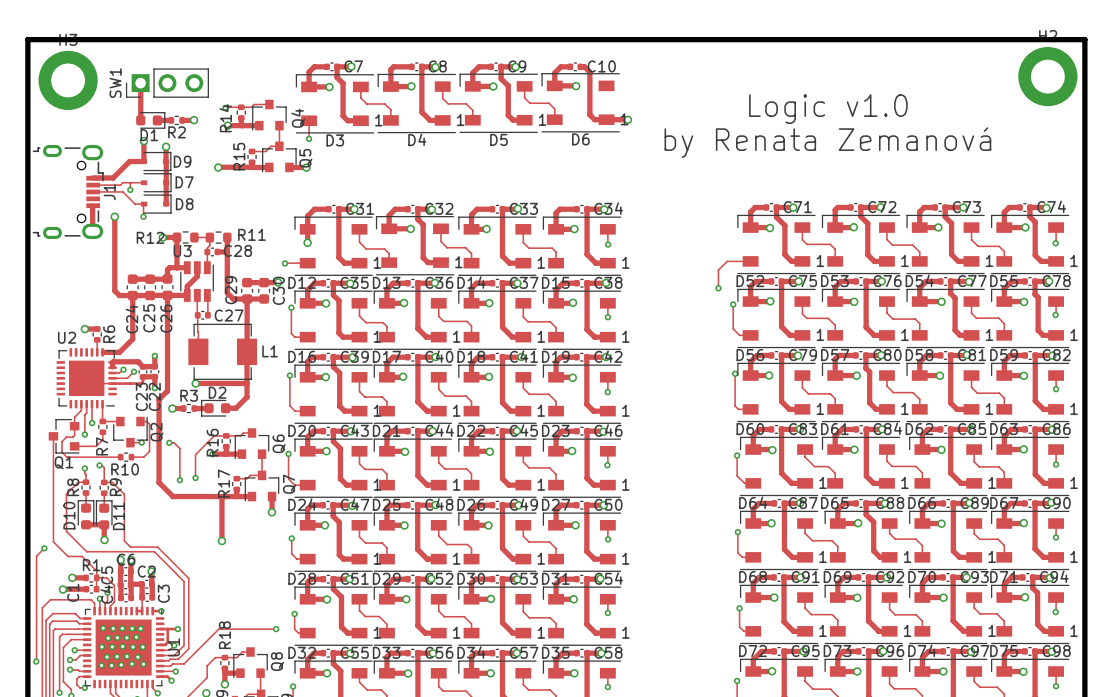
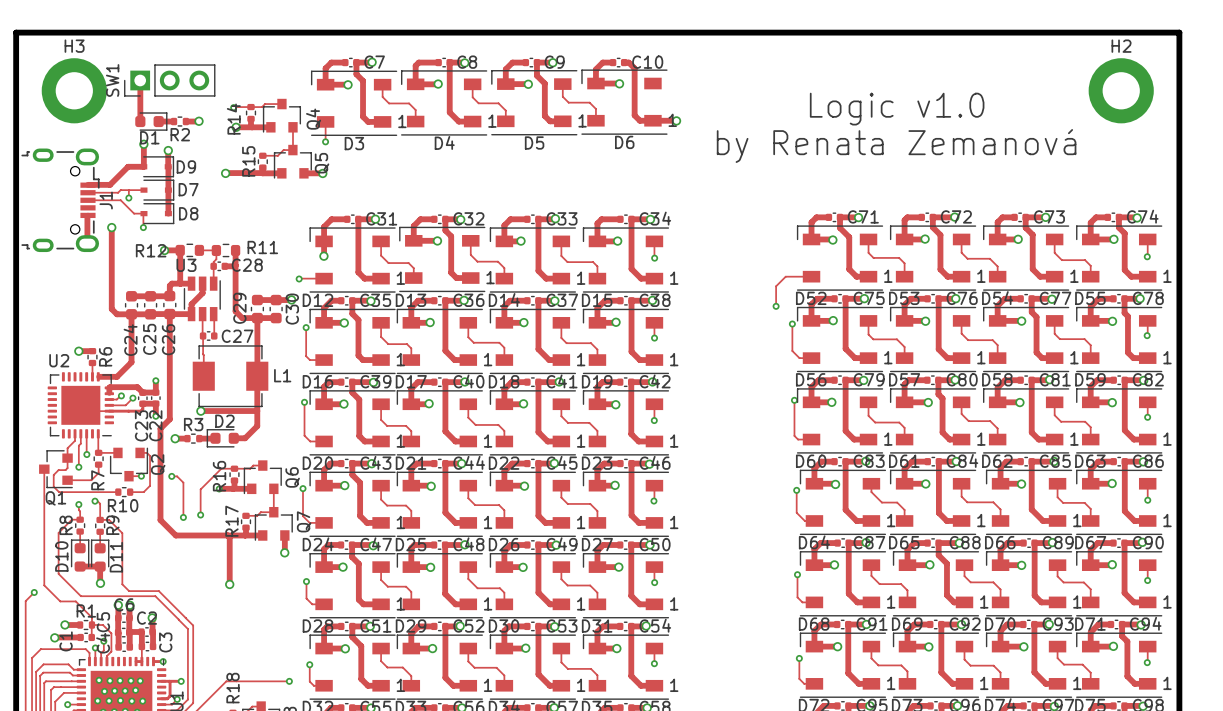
H2 position: (1047, 76) -> (1121, 90)
H3 position: (68, 80) -> (74, 90)

